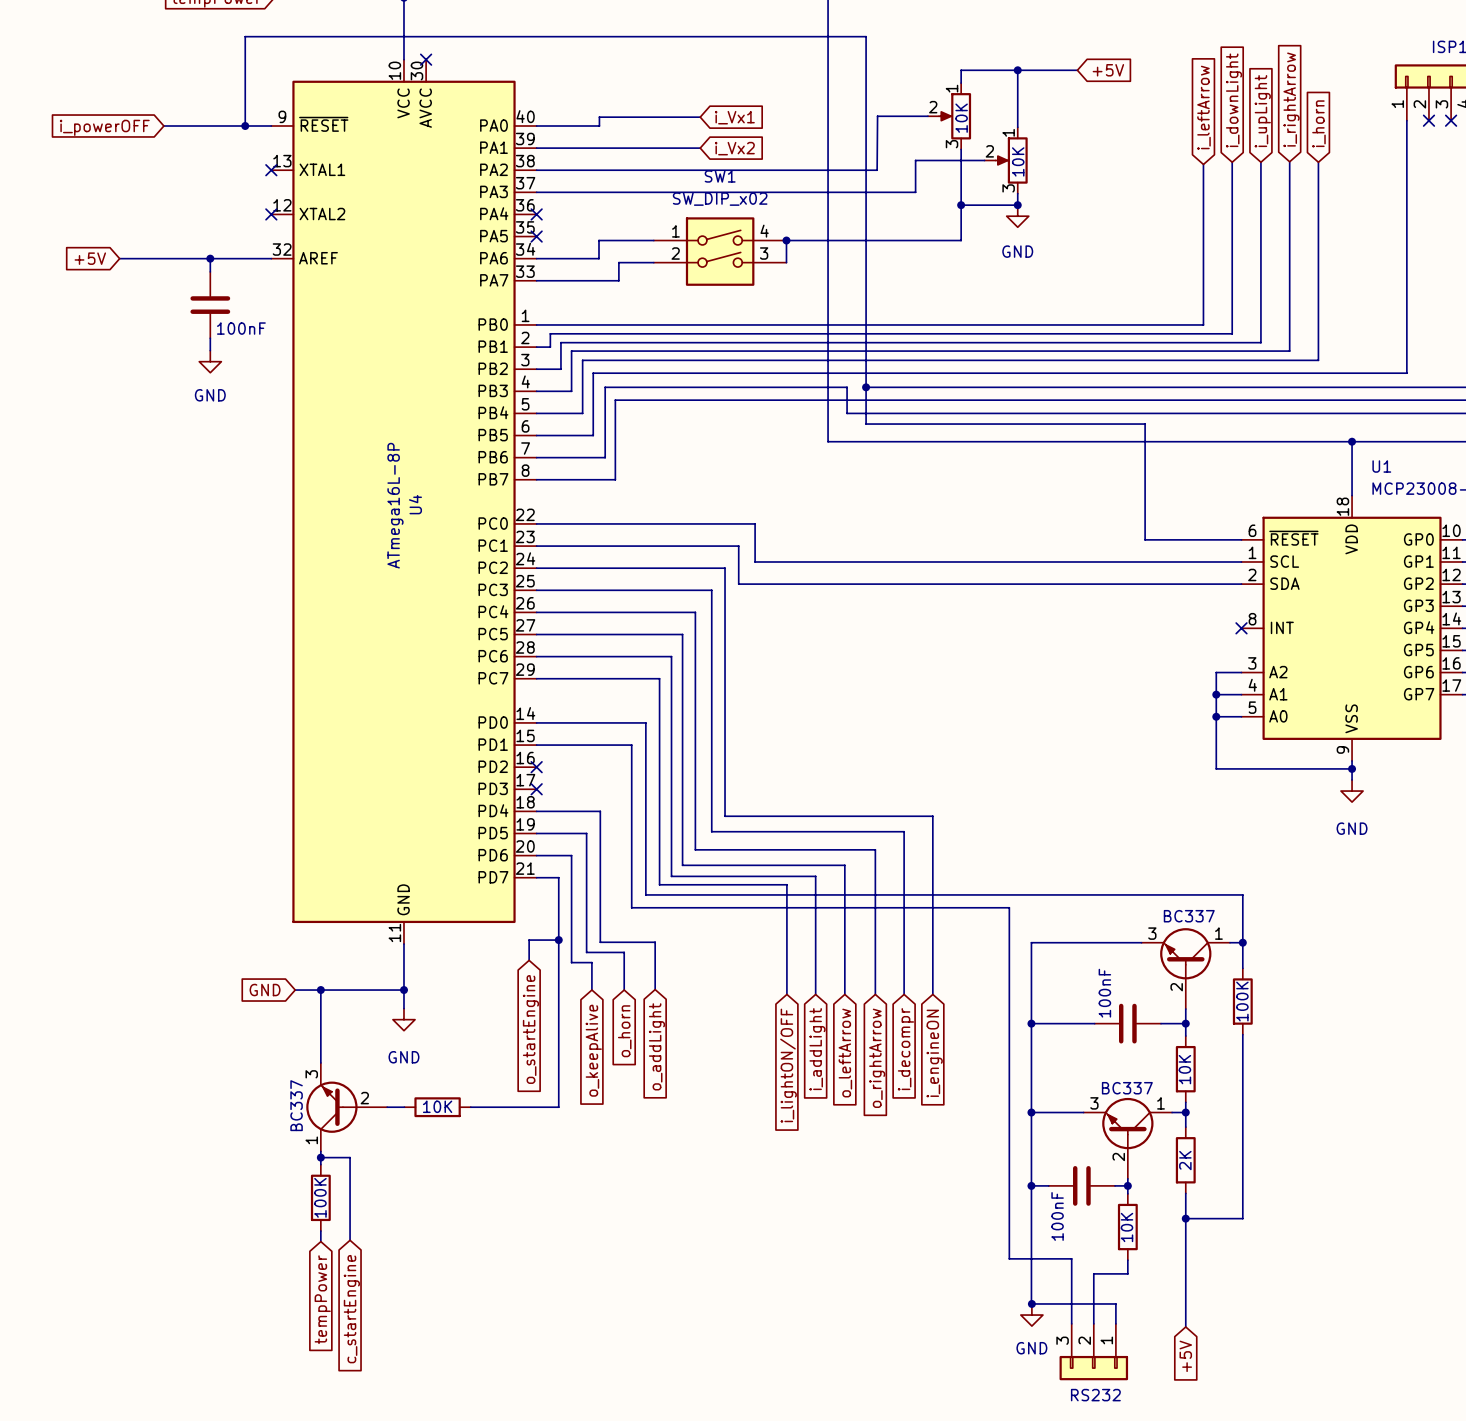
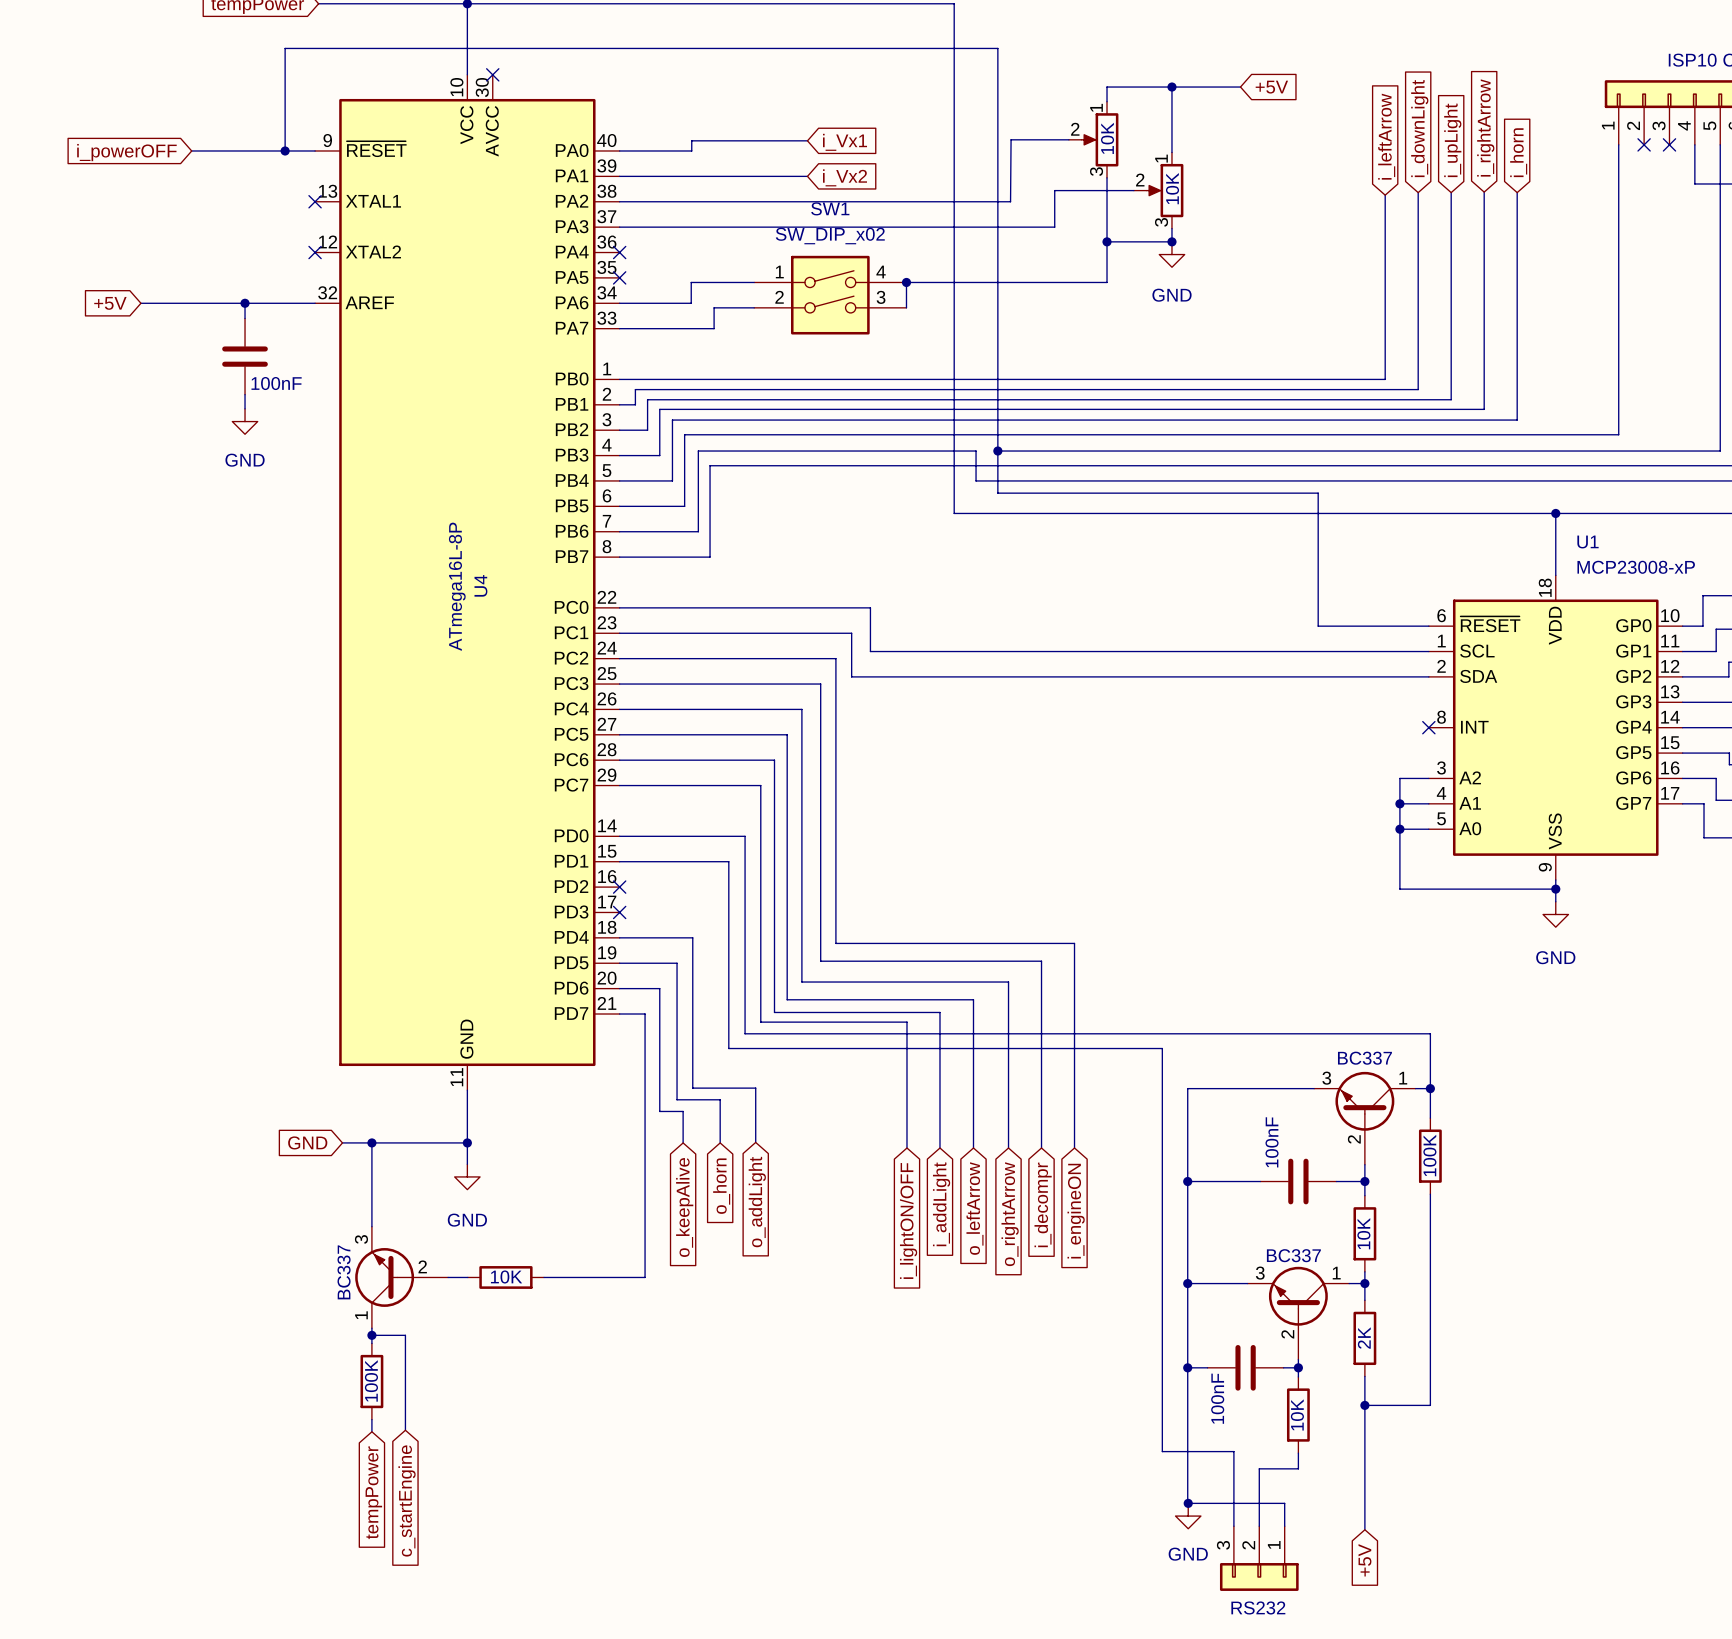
wire: (558, 940) (529, 940) (529, 960) -> none
junction: (558, 940) -> none
global label: o_startEngine (530, 1029) -> none

